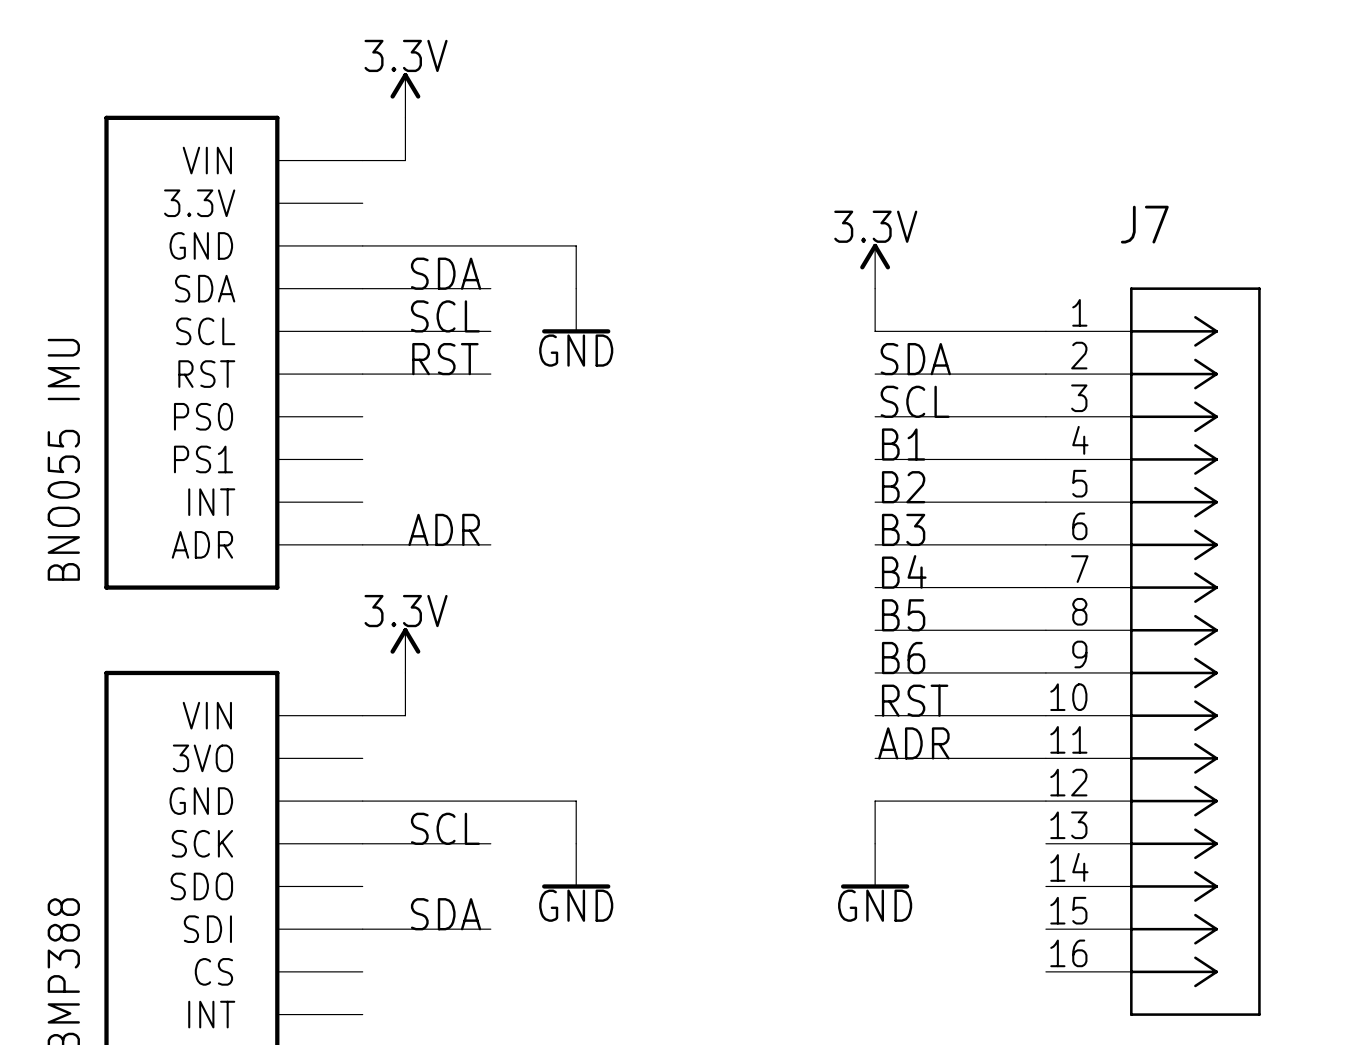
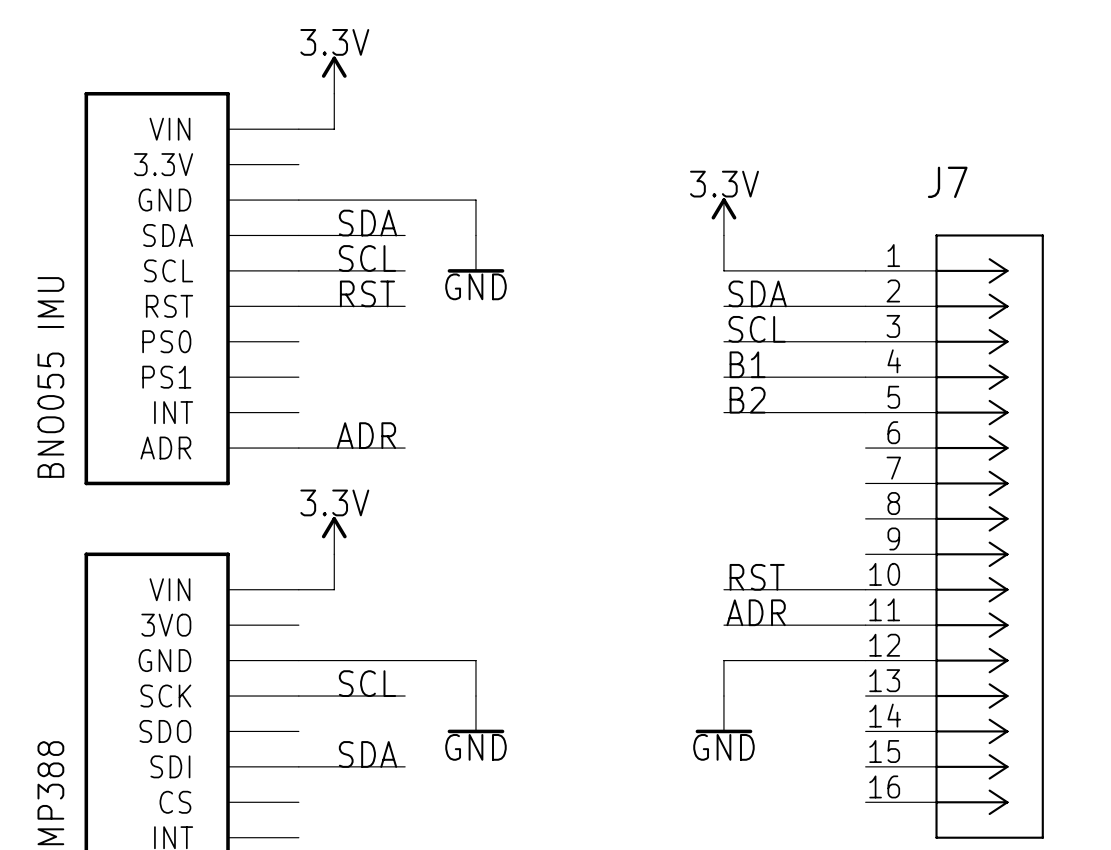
label: B3 (903, 529) -> none
wire: (875, 544) (1045, 544) -> none
label: B4 (904, 571) -> none
wire: (875, 587) (1045, 587) -> none
label: B5 (903, 615) -> none
wire: (875, 630) (1045, 630) -> none
label: B6 (903, 658) -> none
wire: (875, 672) (1045, 672) -> none

